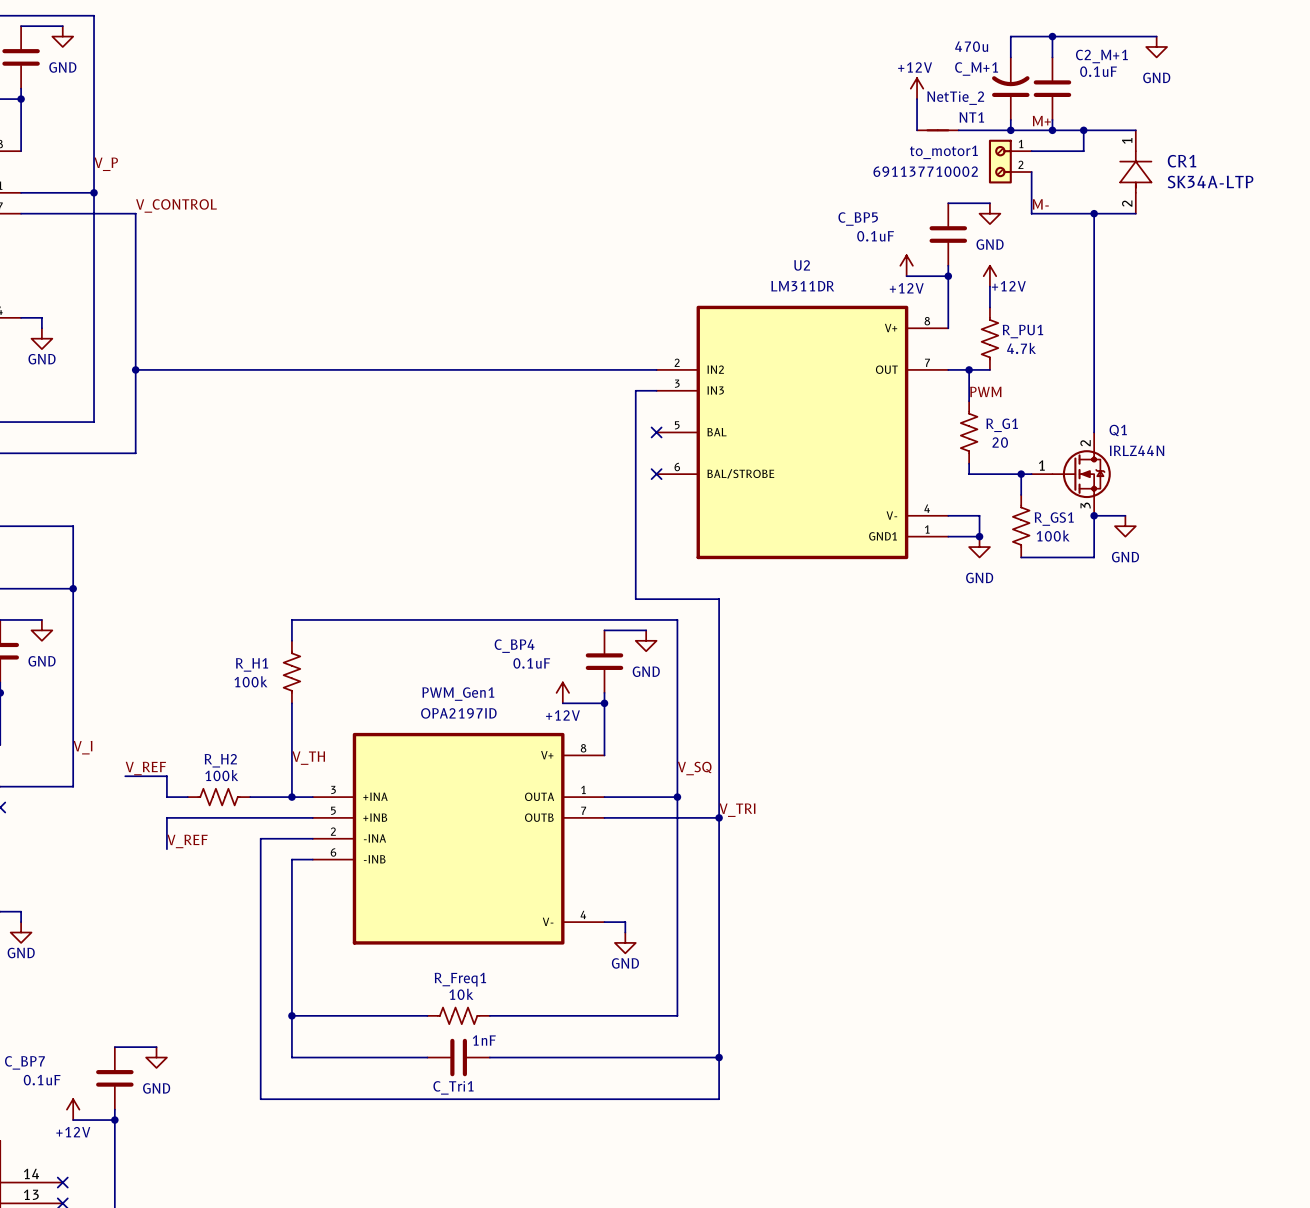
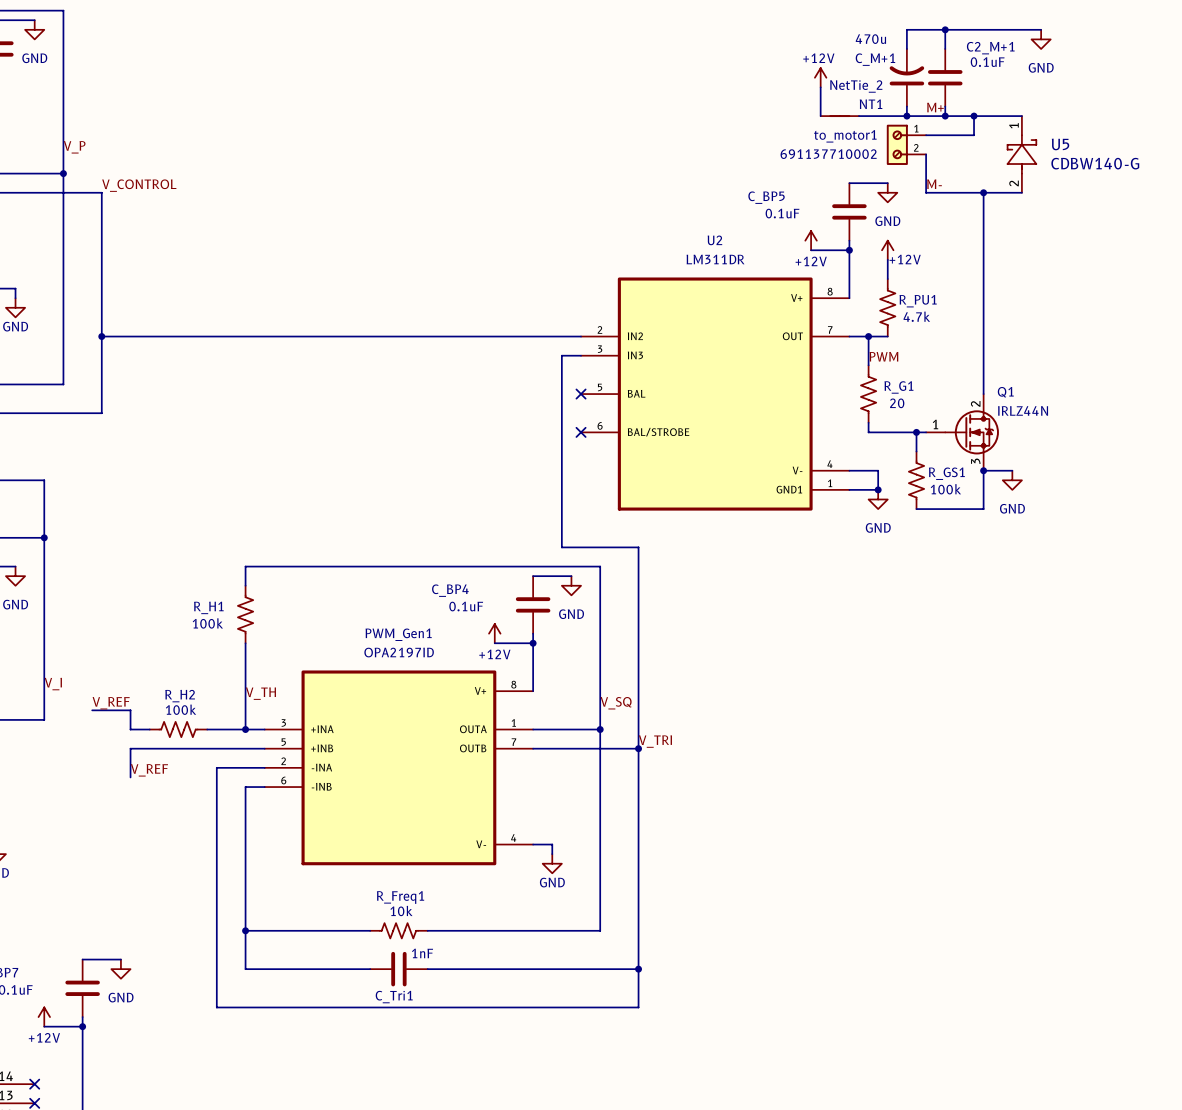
CR1: SK34A-LTP (1135, 172) -> none
U5: none -> CDBW140-G (1021, 154)

